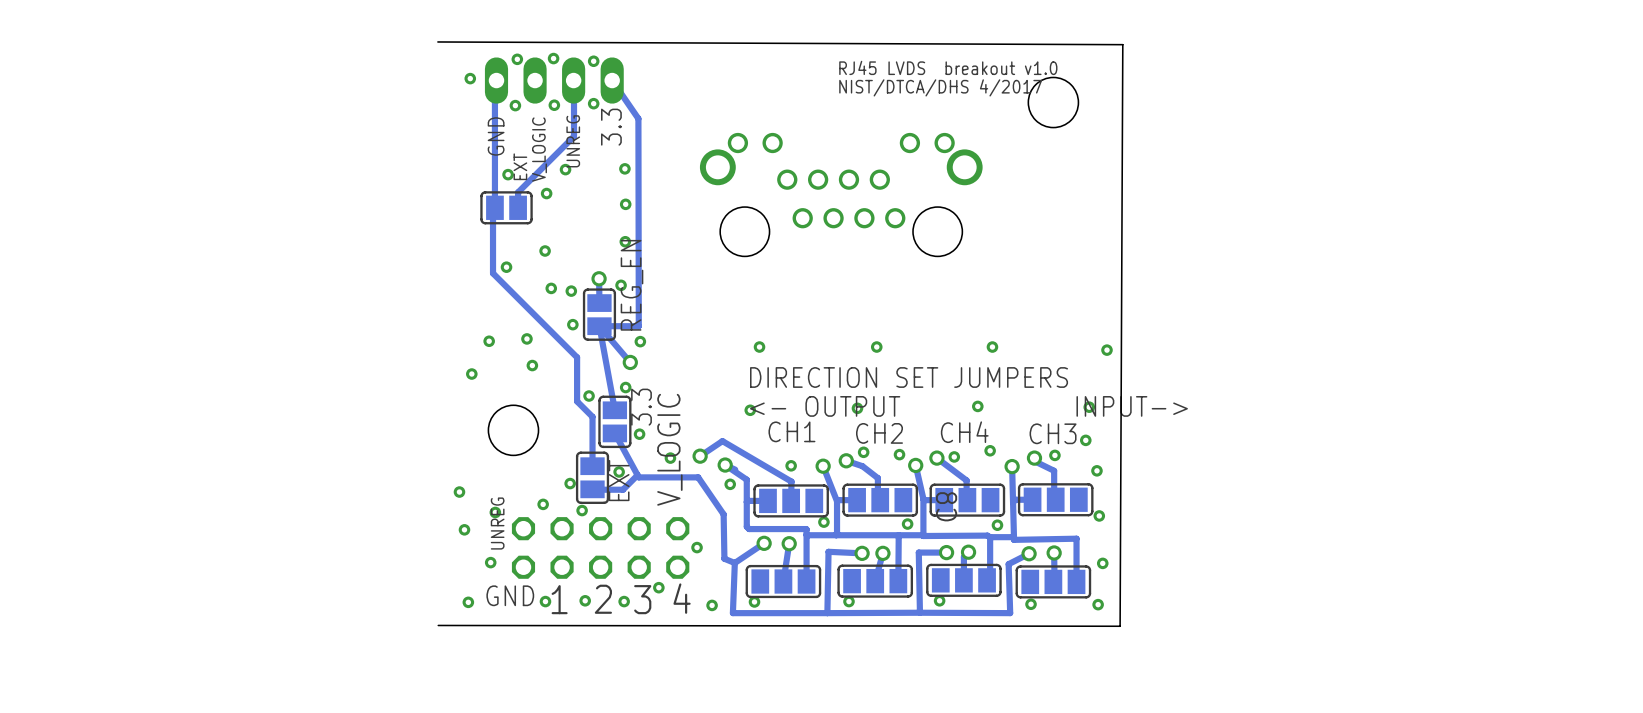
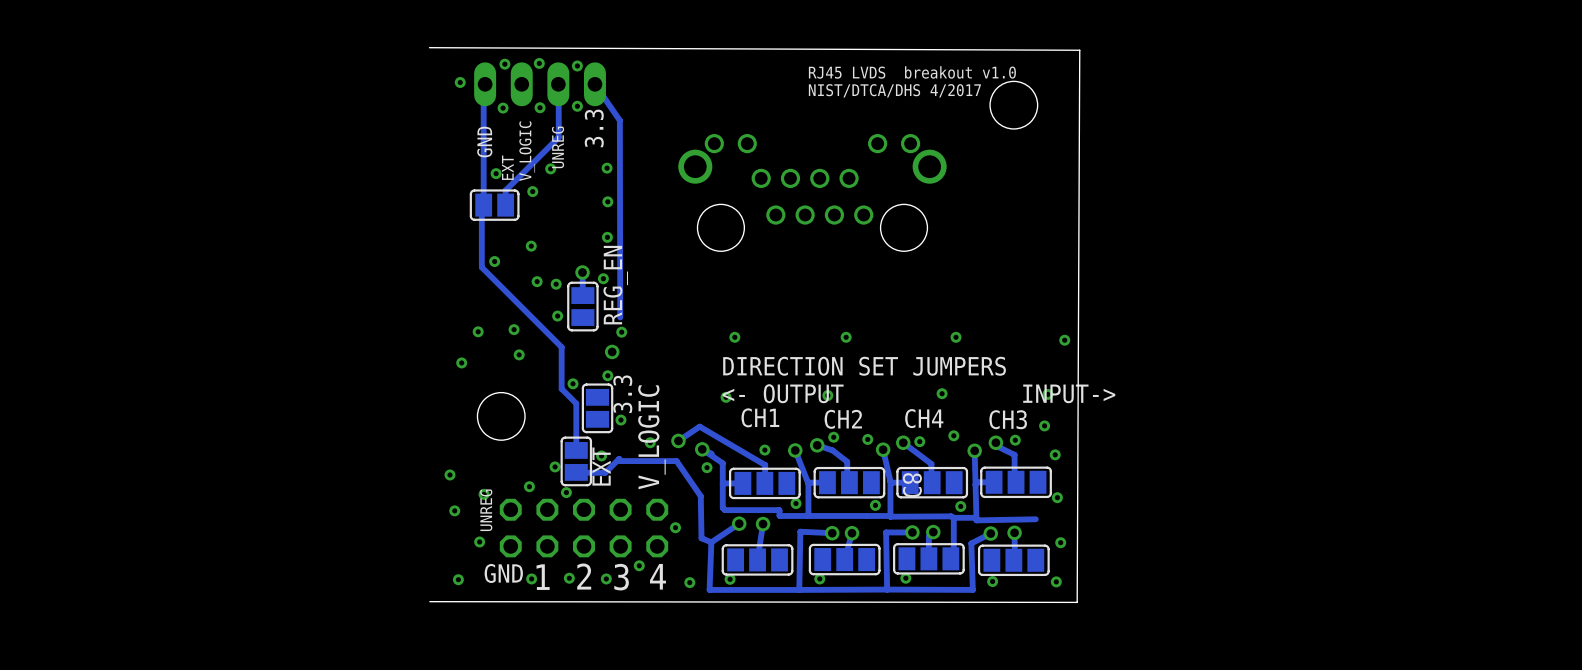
track: (599, 326) (614, 410) -> none
track: (599, 326) (630, 362) -> none
track: (638, 326) (599, 326) -> none
track: (614, 433) (637, 475) -> none
track: (806, 534) (806, 581) -> none
track: (898, 535) (898, 581) -> none
track: (1076, 538) (1076, 581) -> none

